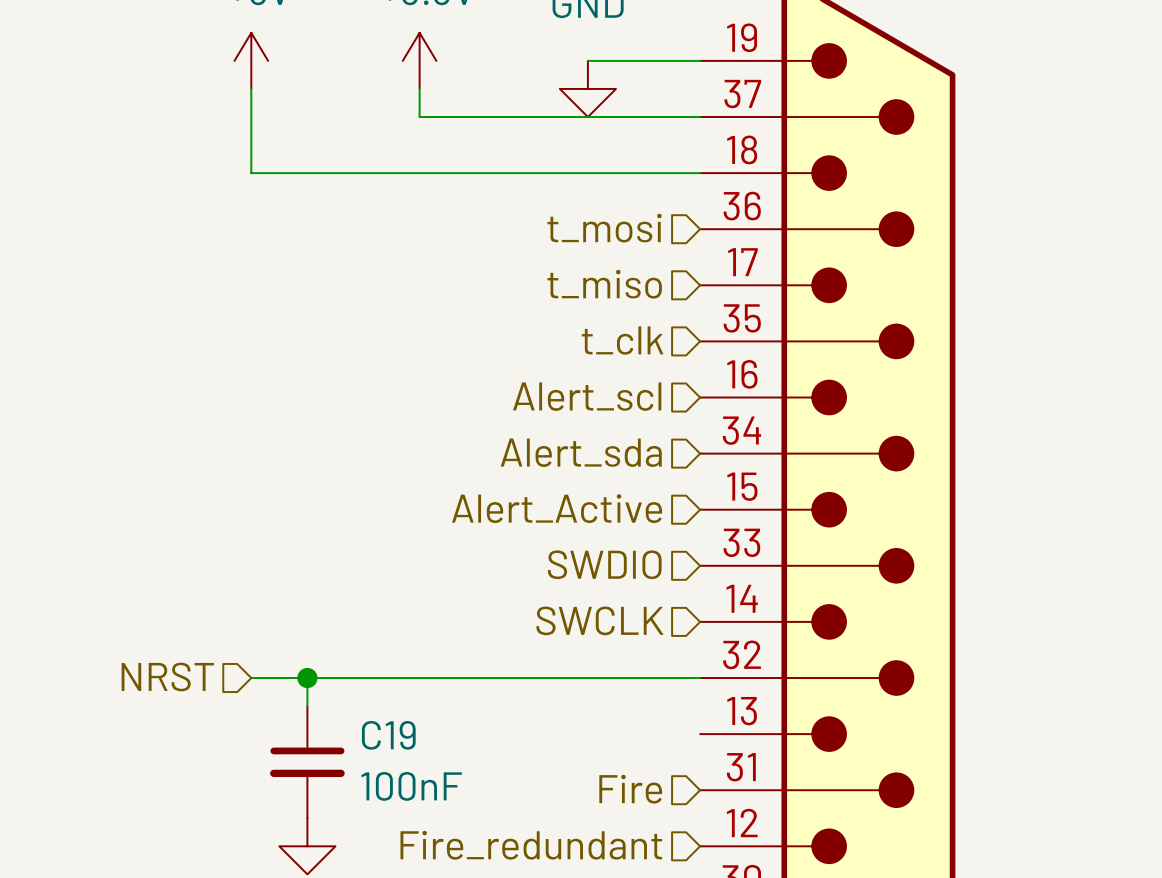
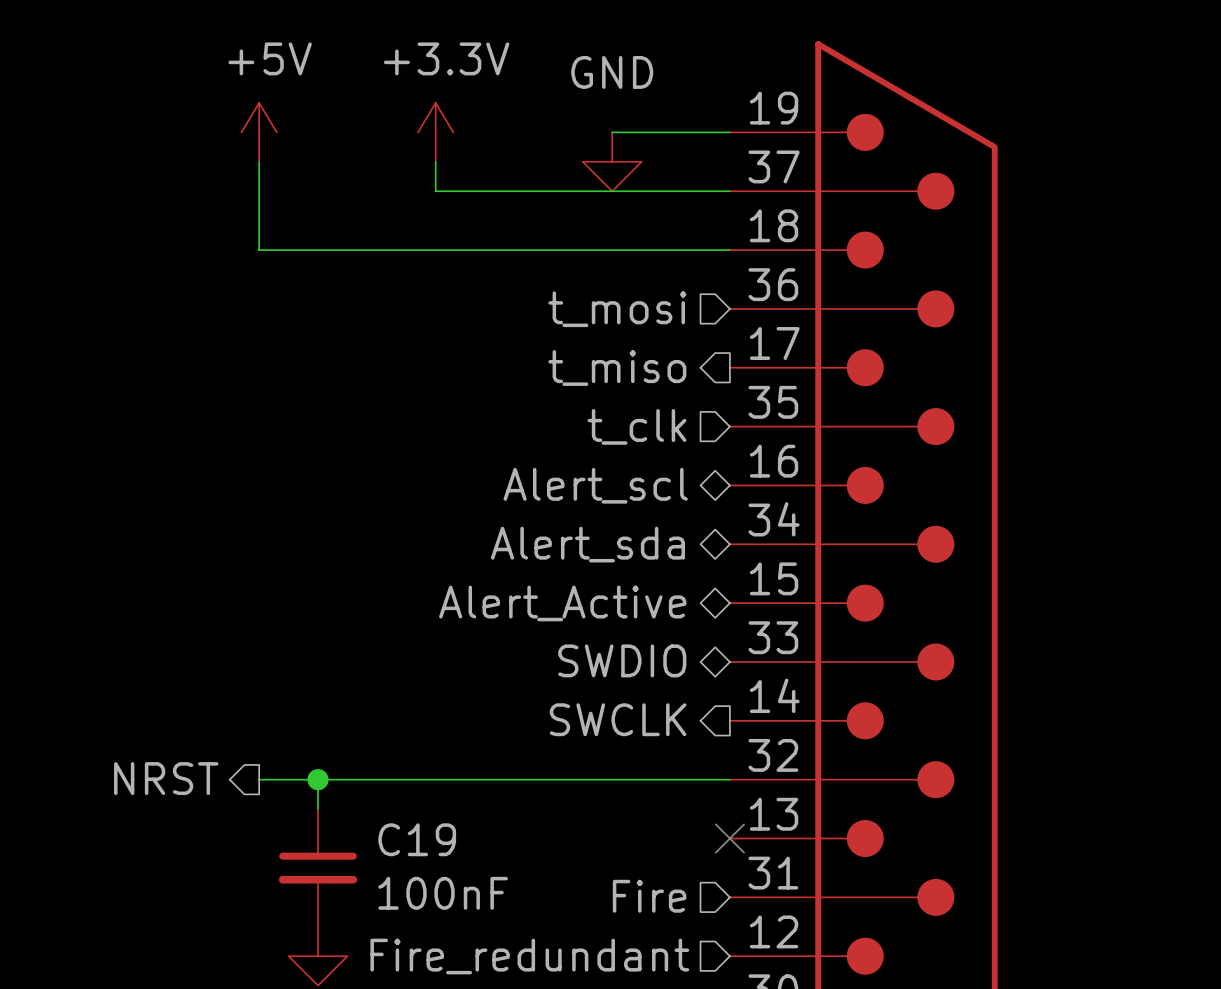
hierarchical label shape: input (604, 284) -> output (617, 368)
hierarchical label shape: input (587, 396) -> bidirectional (595, 485)
hierarchical label shape: input (581, 452) -> bidirectional (587, 544)
hierarchical label shape: input (557, 508) -> bidirectional (562, 603)
hierarchical label shape: input (604, 564) -> bidirectional (622, 660)
hierarchical label shape: input (599, 620) -> output (618, 719)
hierarchical label shape: input (167, 676) -> output (166, 778)
no-connect mark: none -> (729, 838)

